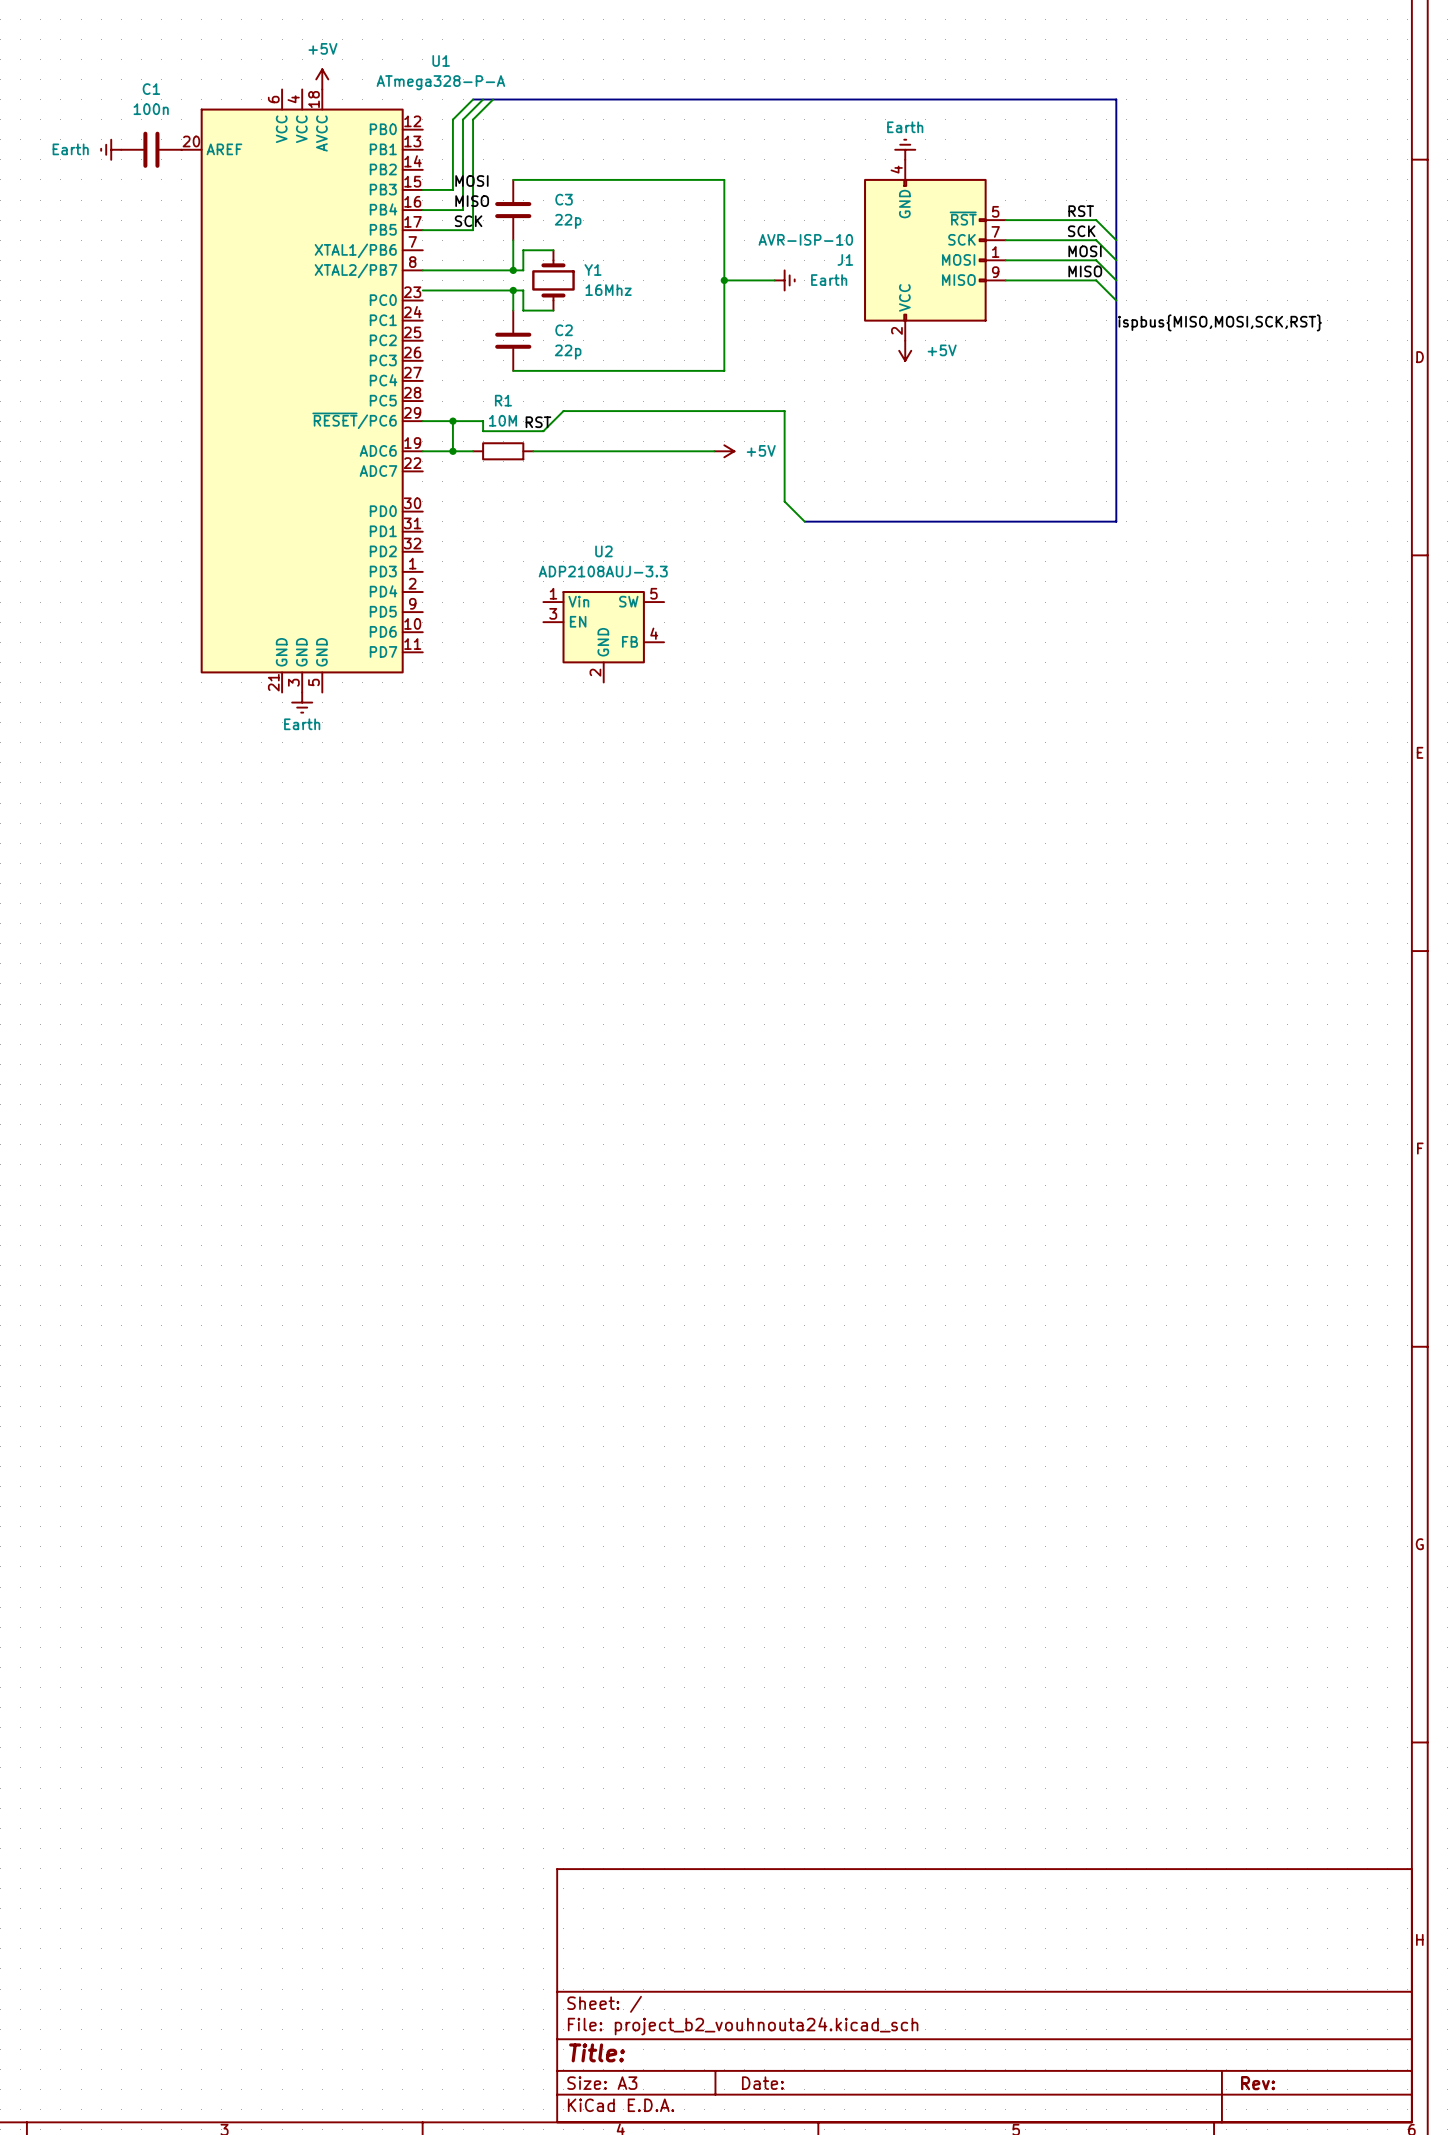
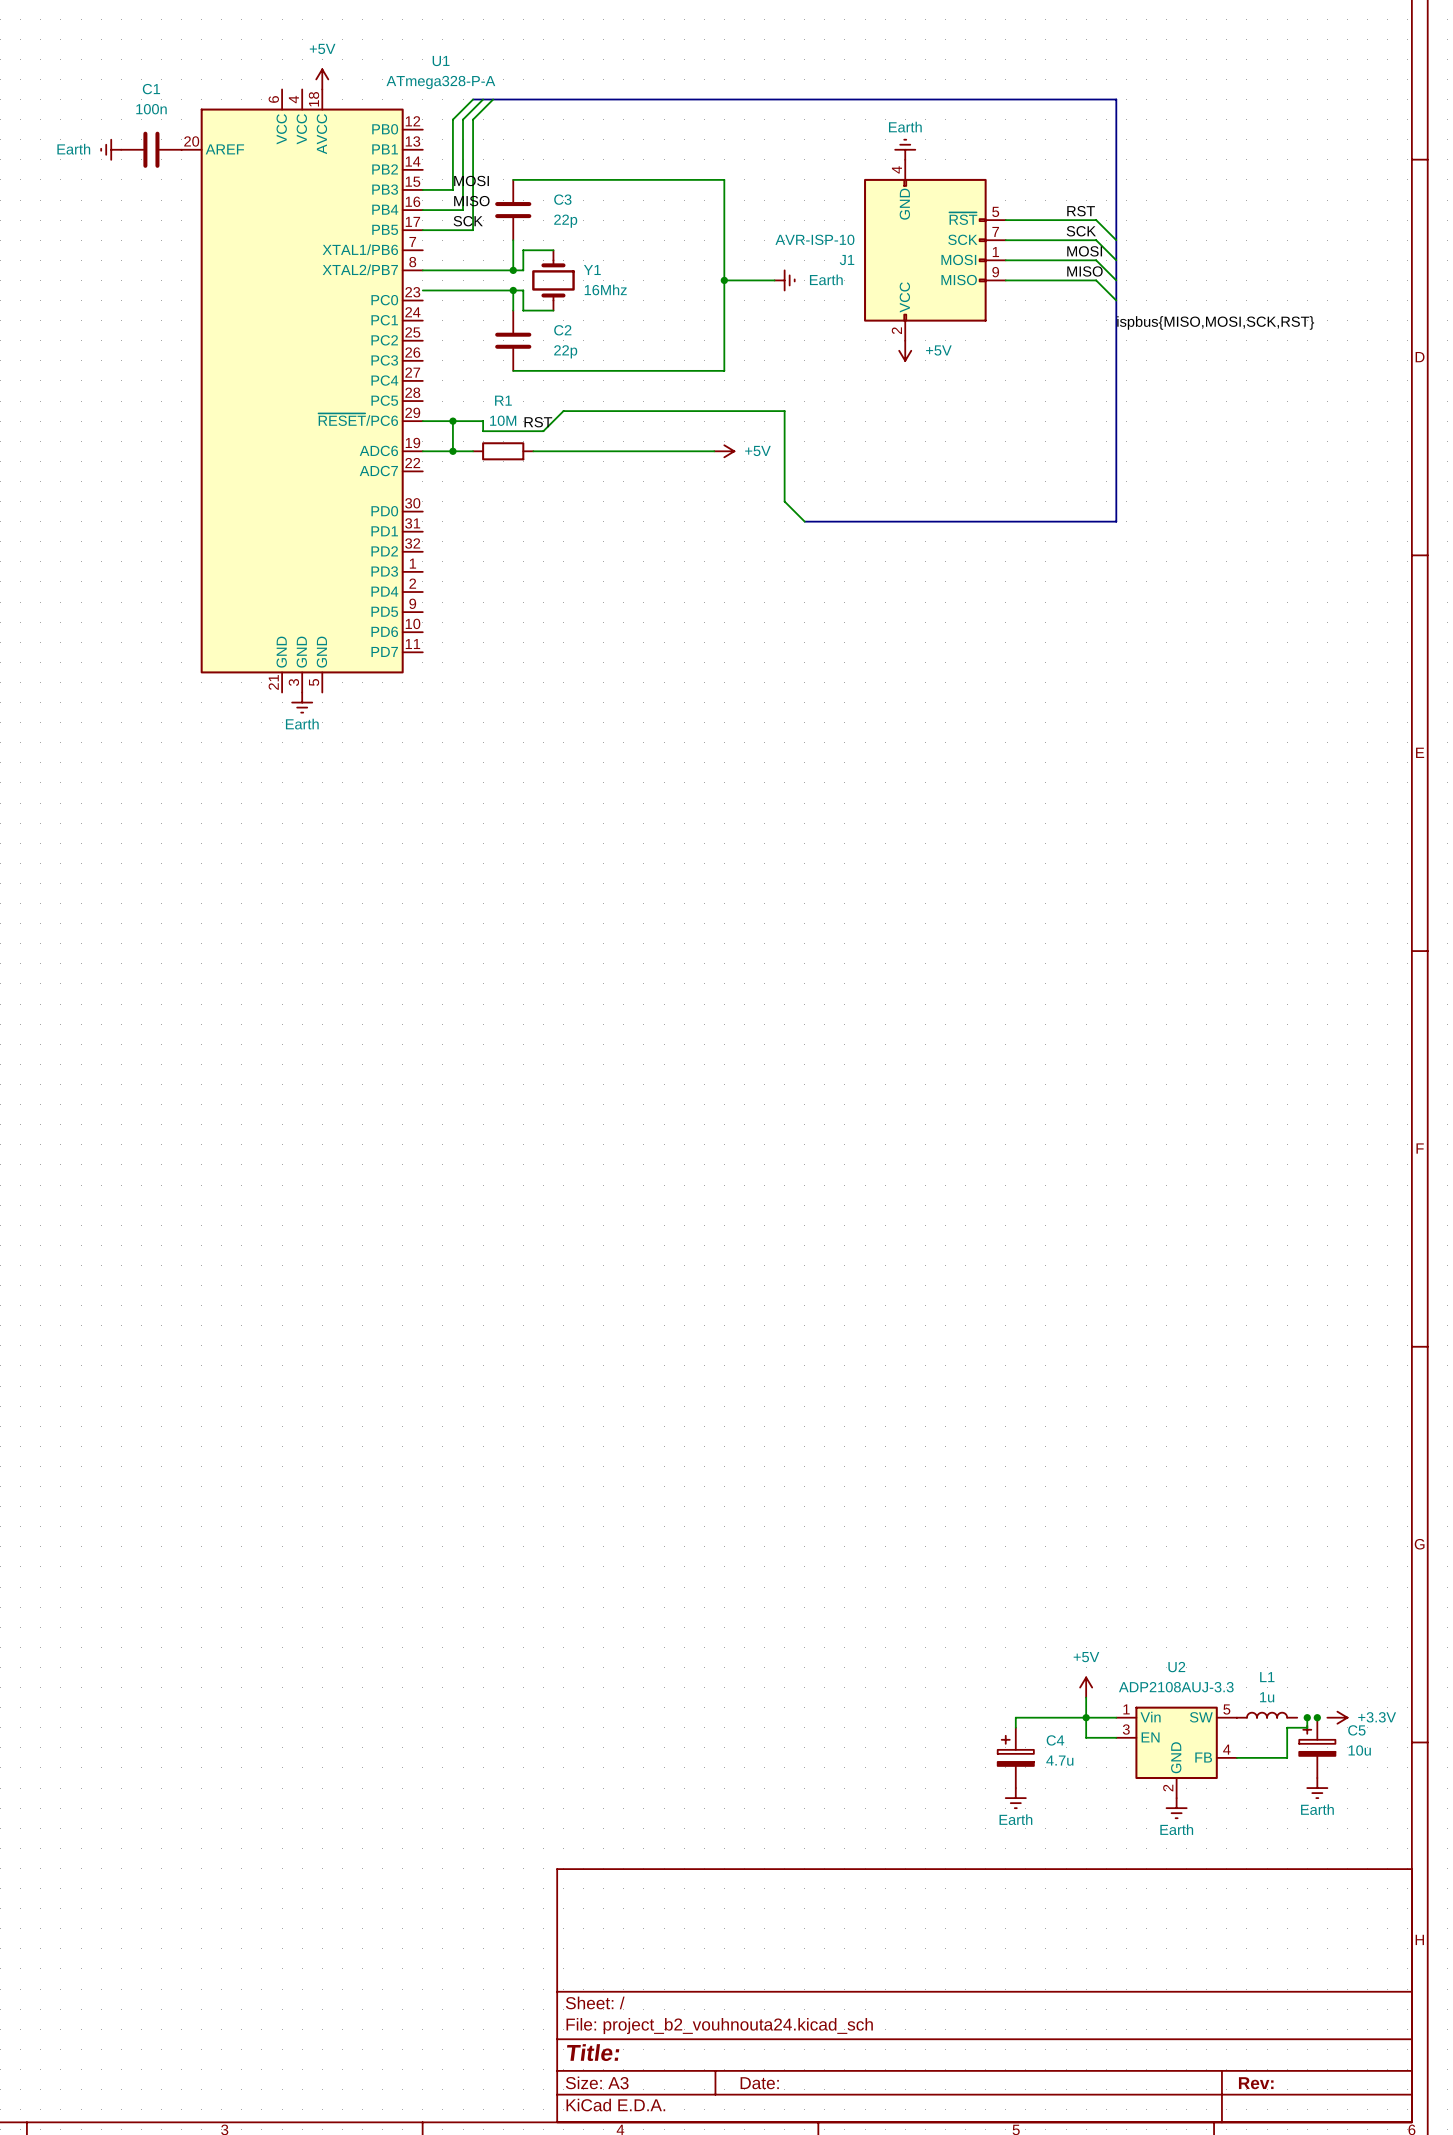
U2 position: (603, 636) -> (1176, 1752)
power symbol: none -> +5V (1086, 1687)
wire: none -> (1086, 1697) (1086, 1737) (1116, 1737)
L1: none -> 1u (1267, 1715)
junction: none -> (1086, 1717)
wire: none -> (1116, 1717) (1015, 1717) (1015, 1727)
wire: none -> (1307, 1717) (1307, 1727) (1287, 1727) (1287, 1757) (1236, 1757)
junction: none -> (1307, 1717)
junction: none -> (1317, 1717)
power symbol: none -> +3.3V (1337, 1717)
C5: none -> 10u (1317, 1747)
C4: none -> 4.7u (1015, 1757)
power symbol: none -> Earth (1317, 1788)
power symbol: none -> Earth (1015, 1798)
power symbol: none -> Earth (1176, 1808)

